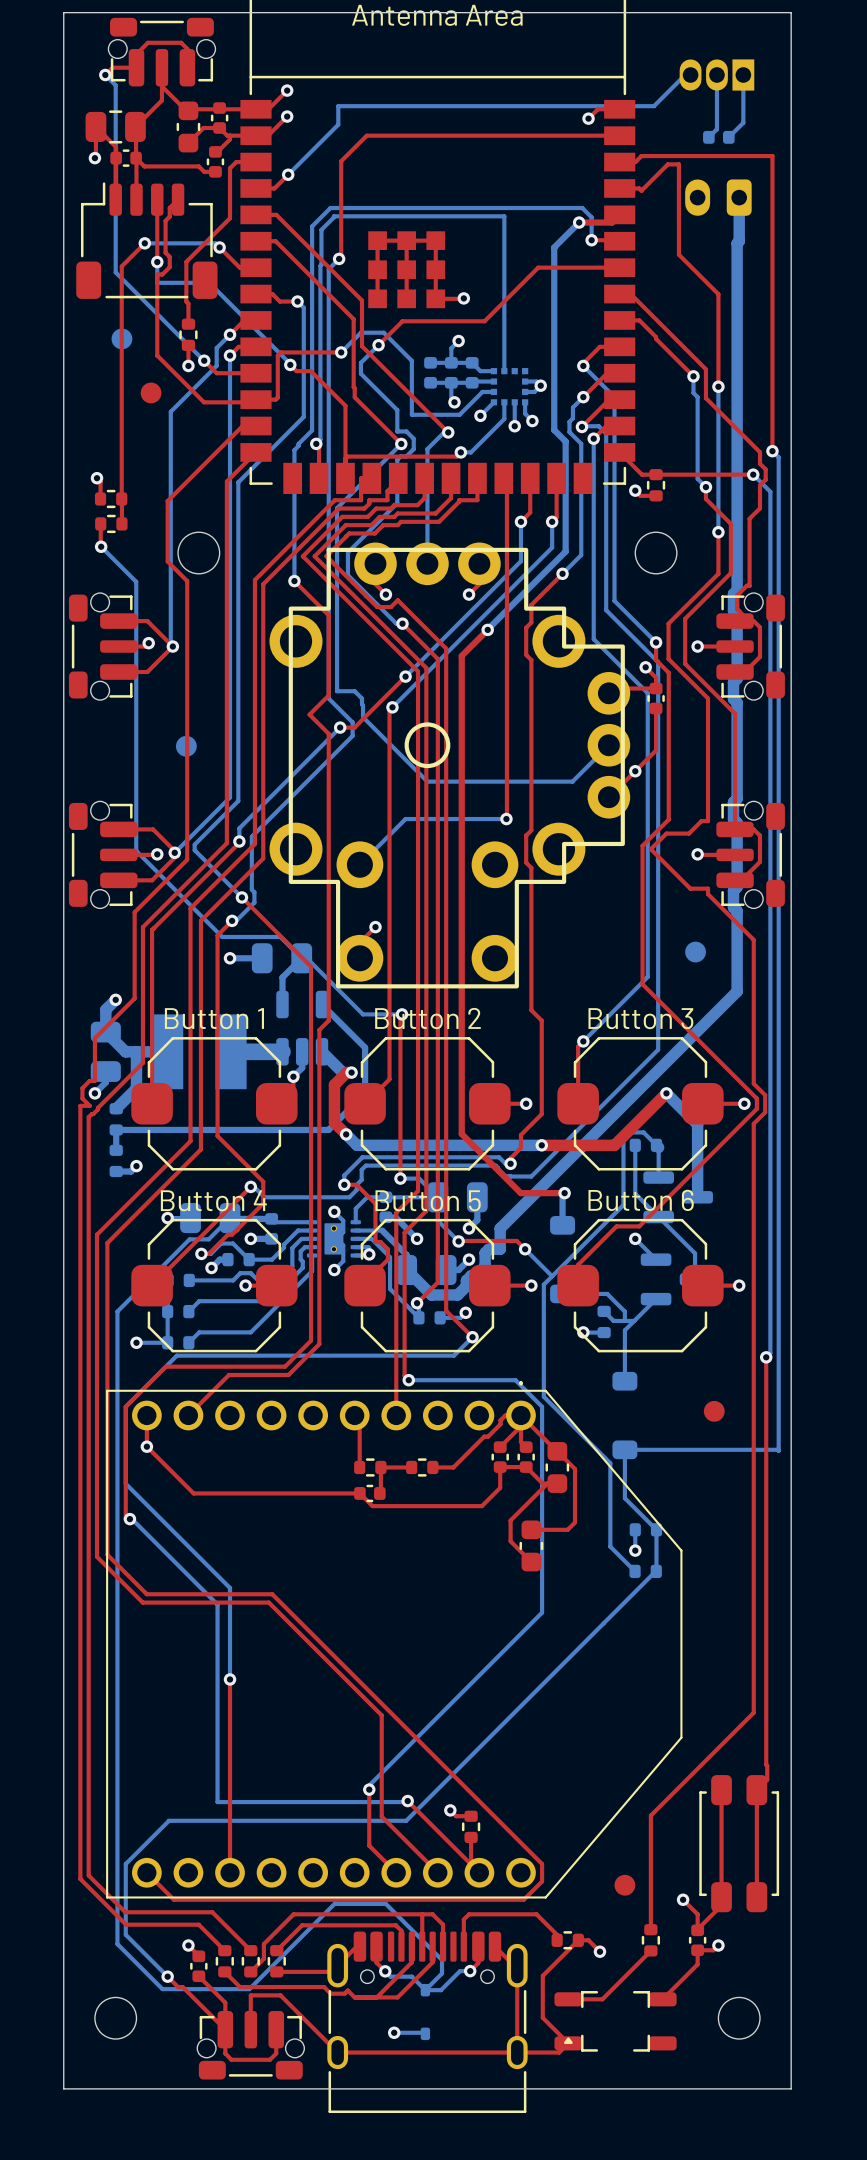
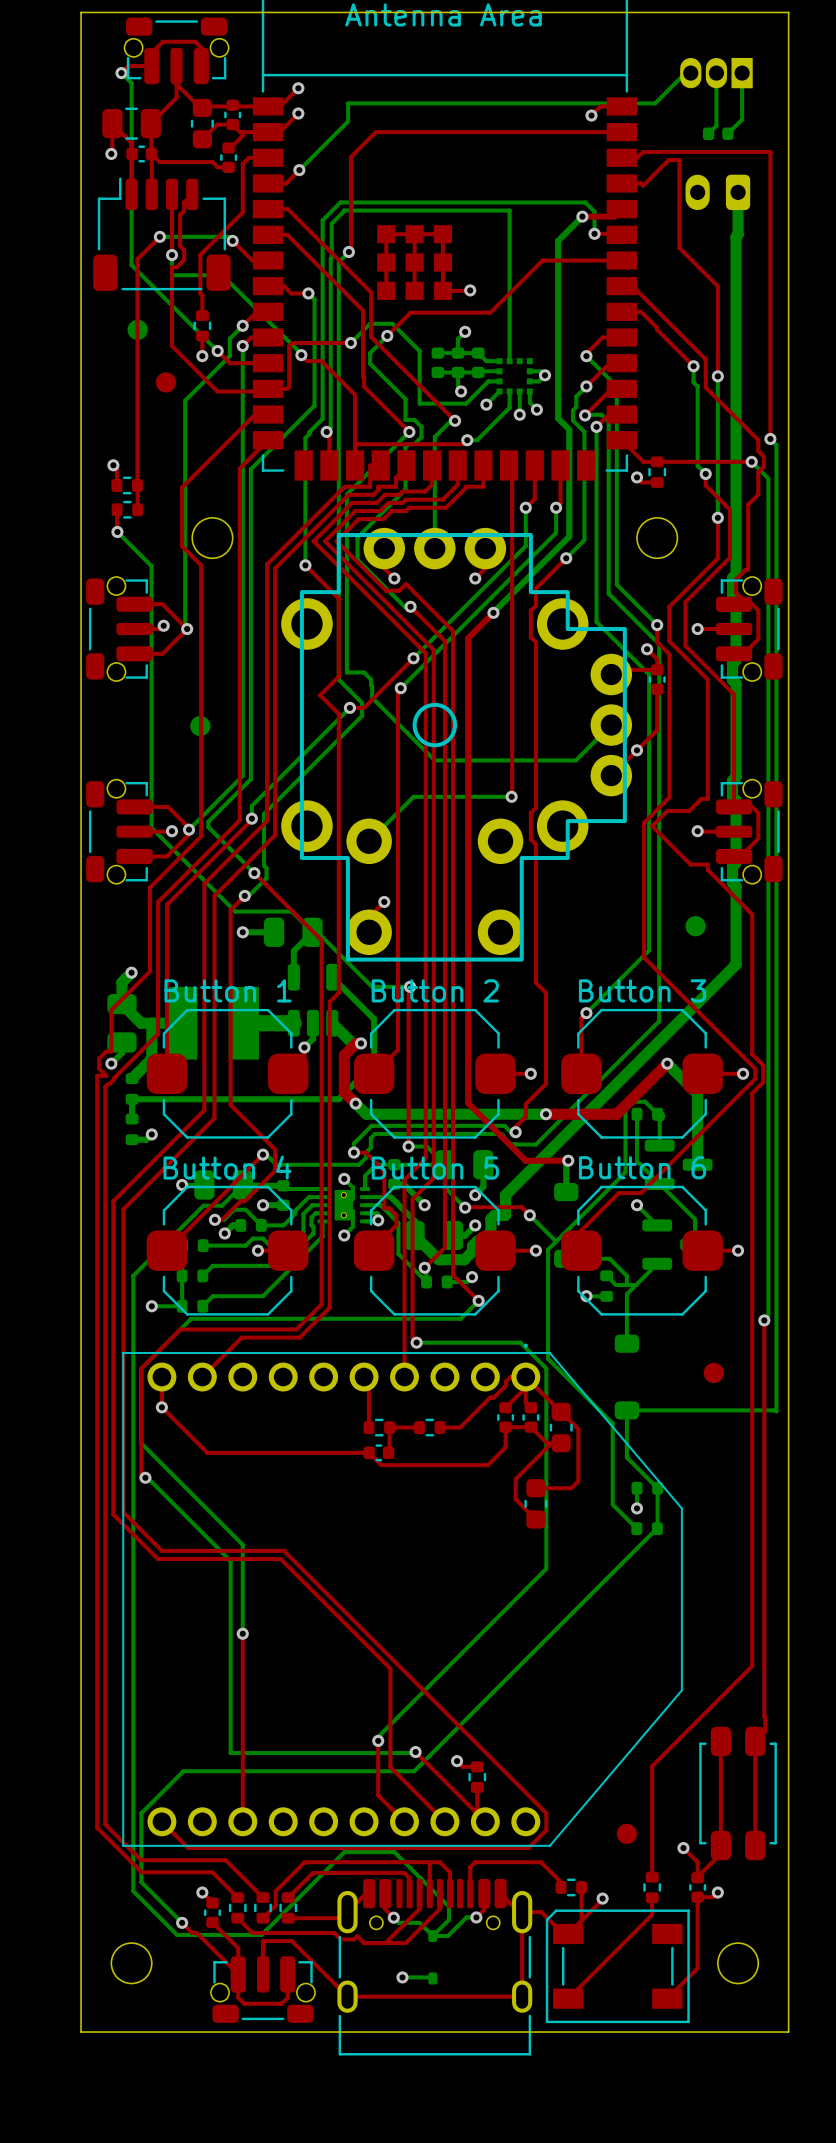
top track: none -> (581, 1887) (581, 1920)
top track: (650, 1950) (602, 1999) (568, 1999) -> (652, 1897) (652, 1914) (568, 1998)
top track: (599, 1951) (588, 1940) (578, 1940) (542, 1975) (542, 2017) (568, 2043) (559, 2052) (517, 2052) -> none
top track: none -> (602, 1899) (568, 1933) (568, 1930)
top track: (697, 1964) (662, 1999) -> (697, 1910) (697, 1968) (667, 1998)
top track: none -> (522, 1912) (541, 1912) (568, 1939)
part footprint: [554, 1991, 677, 2052] -> [545, 1909, 690, 2024]

